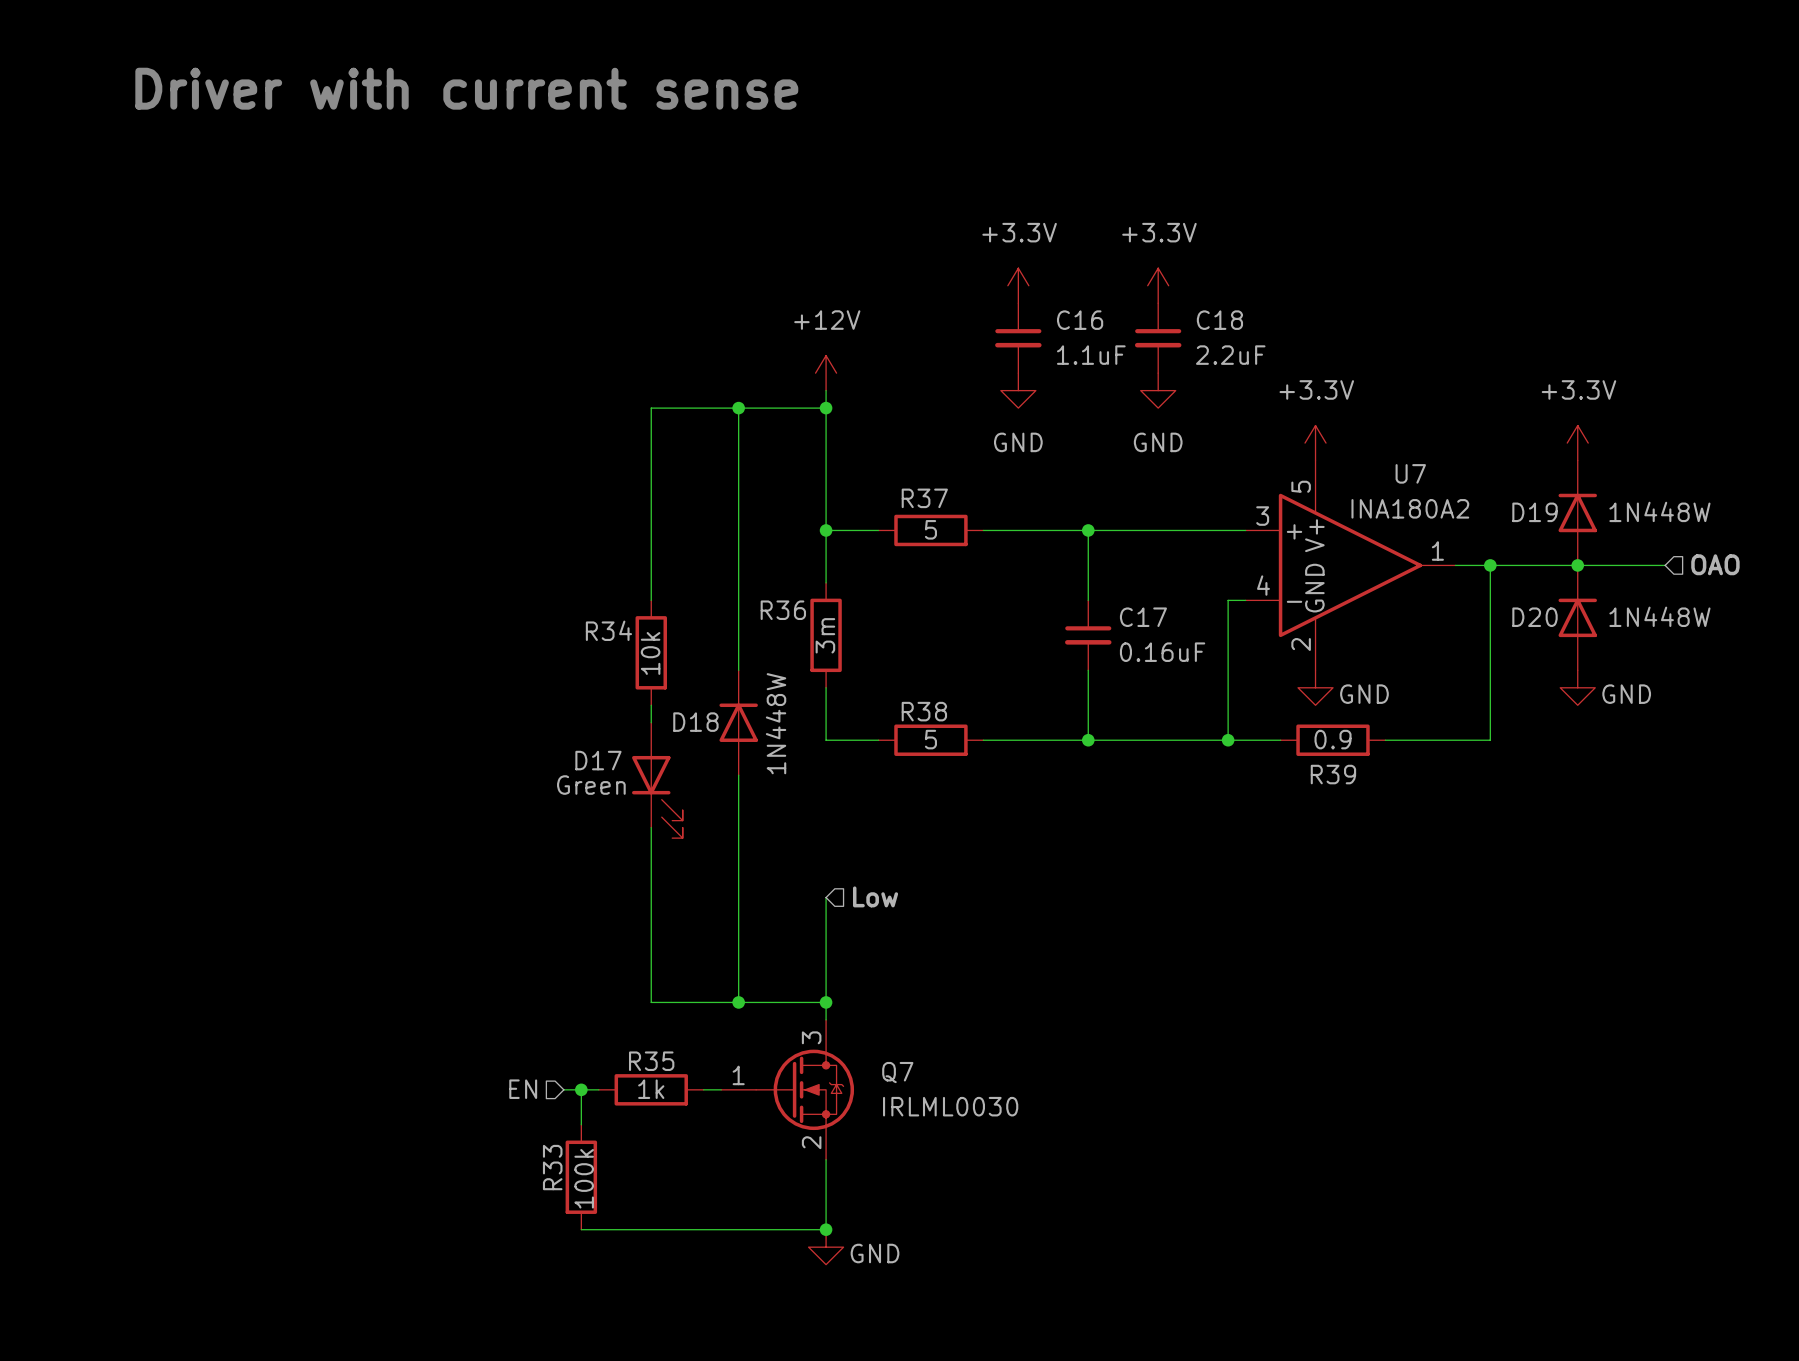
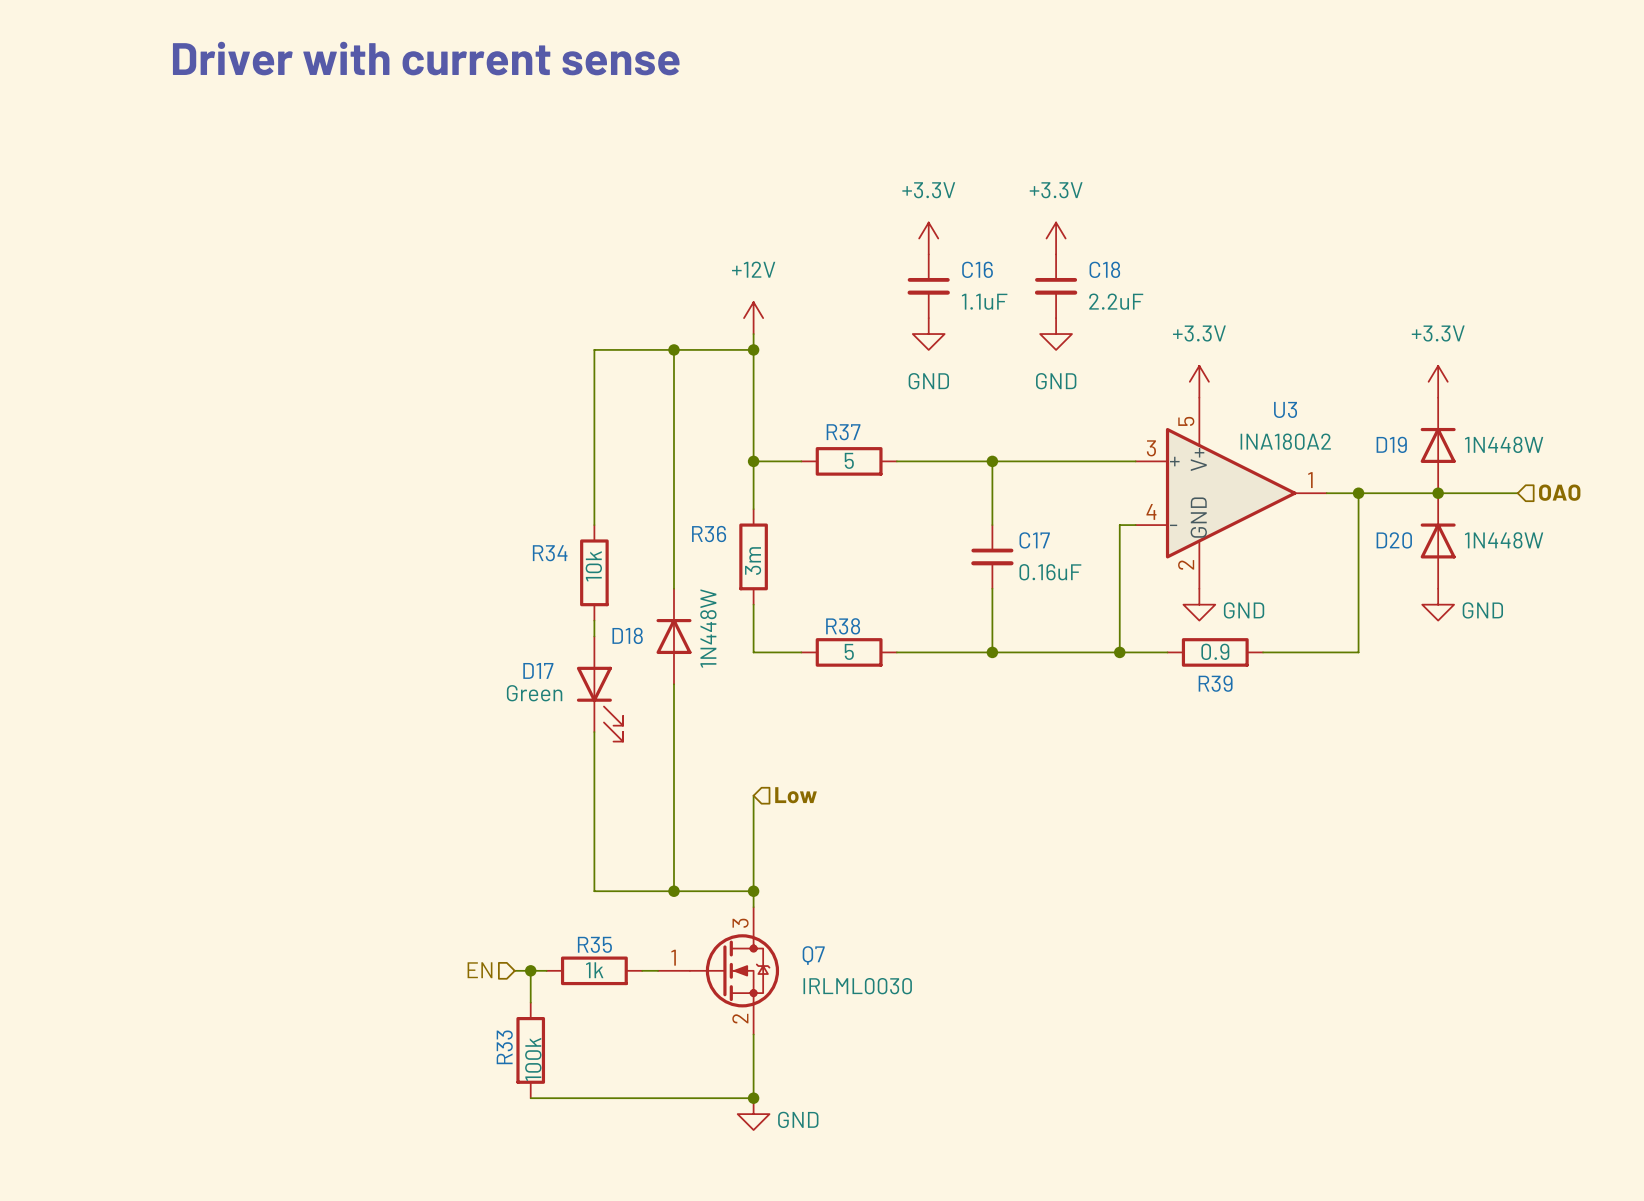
U7 name: U7 (1410, 473) -> U3 (1285, 409)

